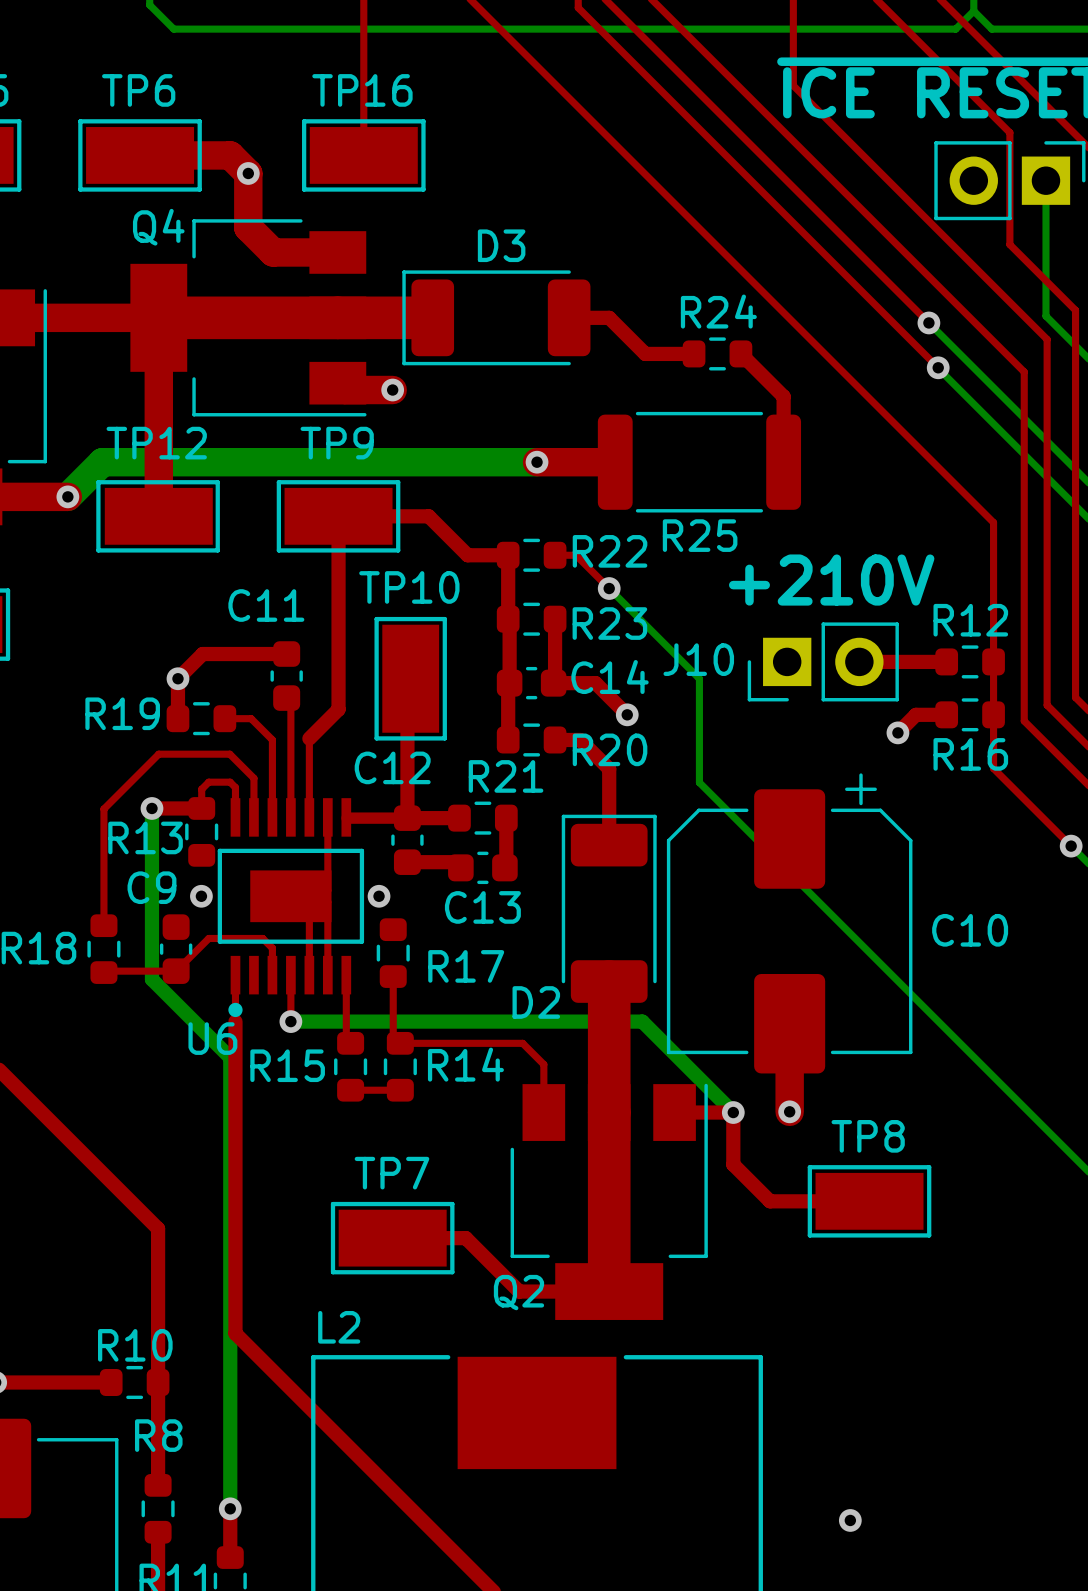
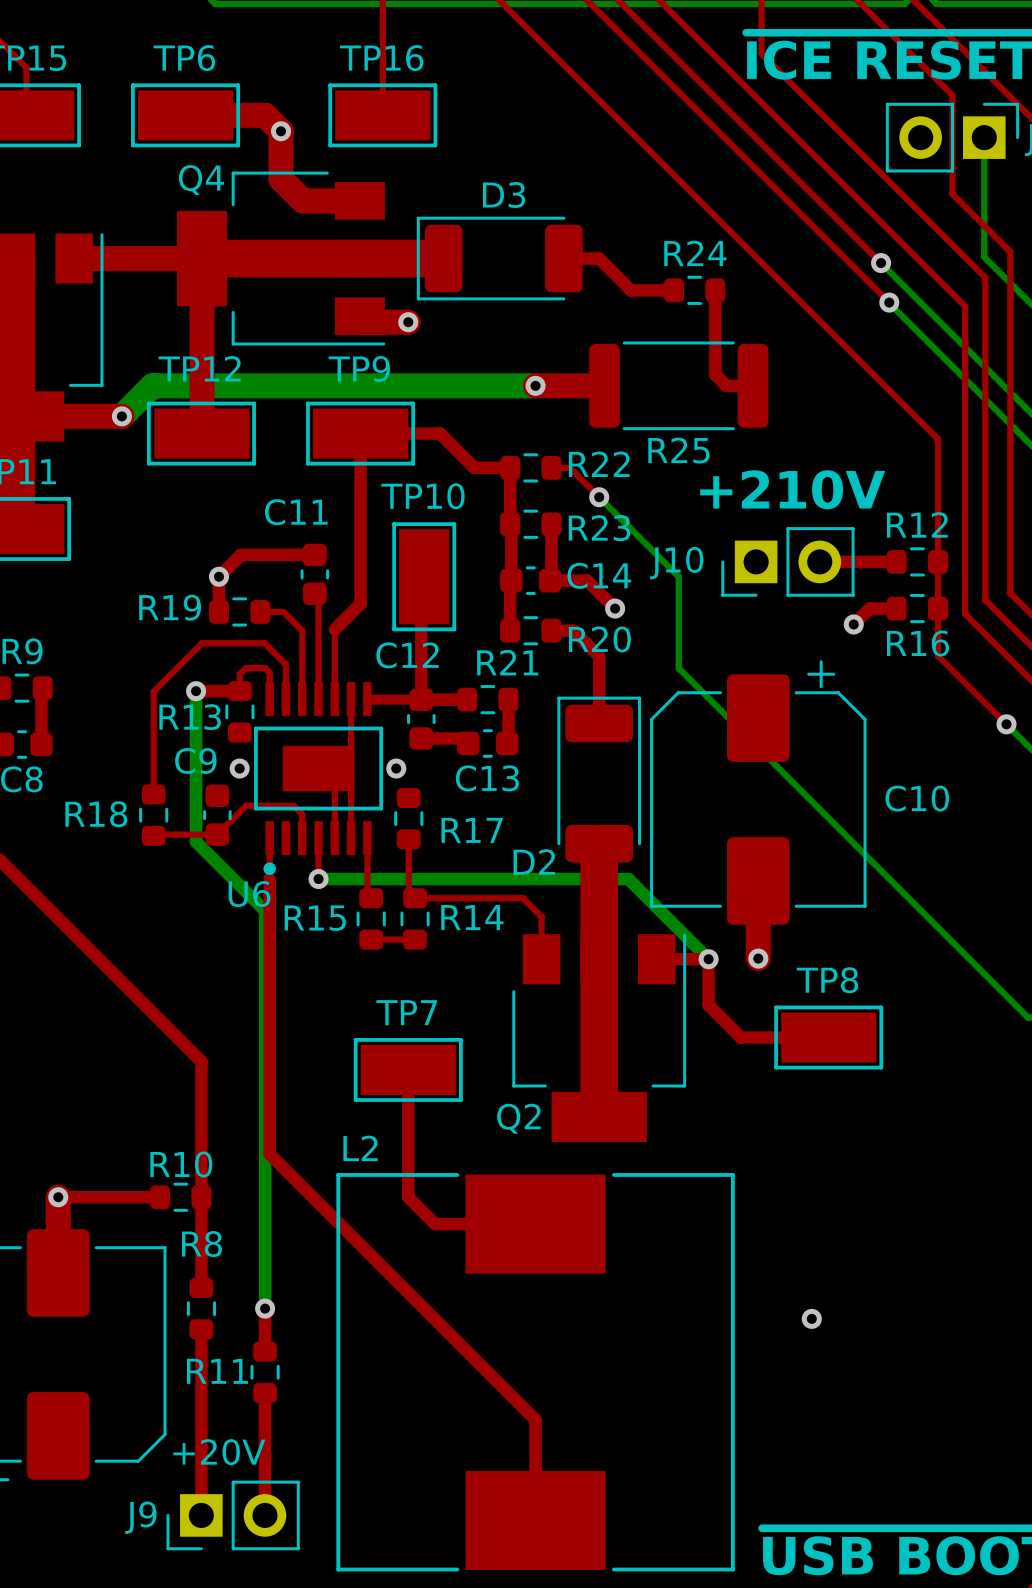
top track: (740, 353) (783, 396) (783, 462) -> (715, 290) (715, 374) (726, 385) (752, 385)
top track: (392, 1238) (465, 1238) (519, 1291) (609, 1291) -> (408, 1069) (408, 1197) (435, 1224) (535, 1224)

